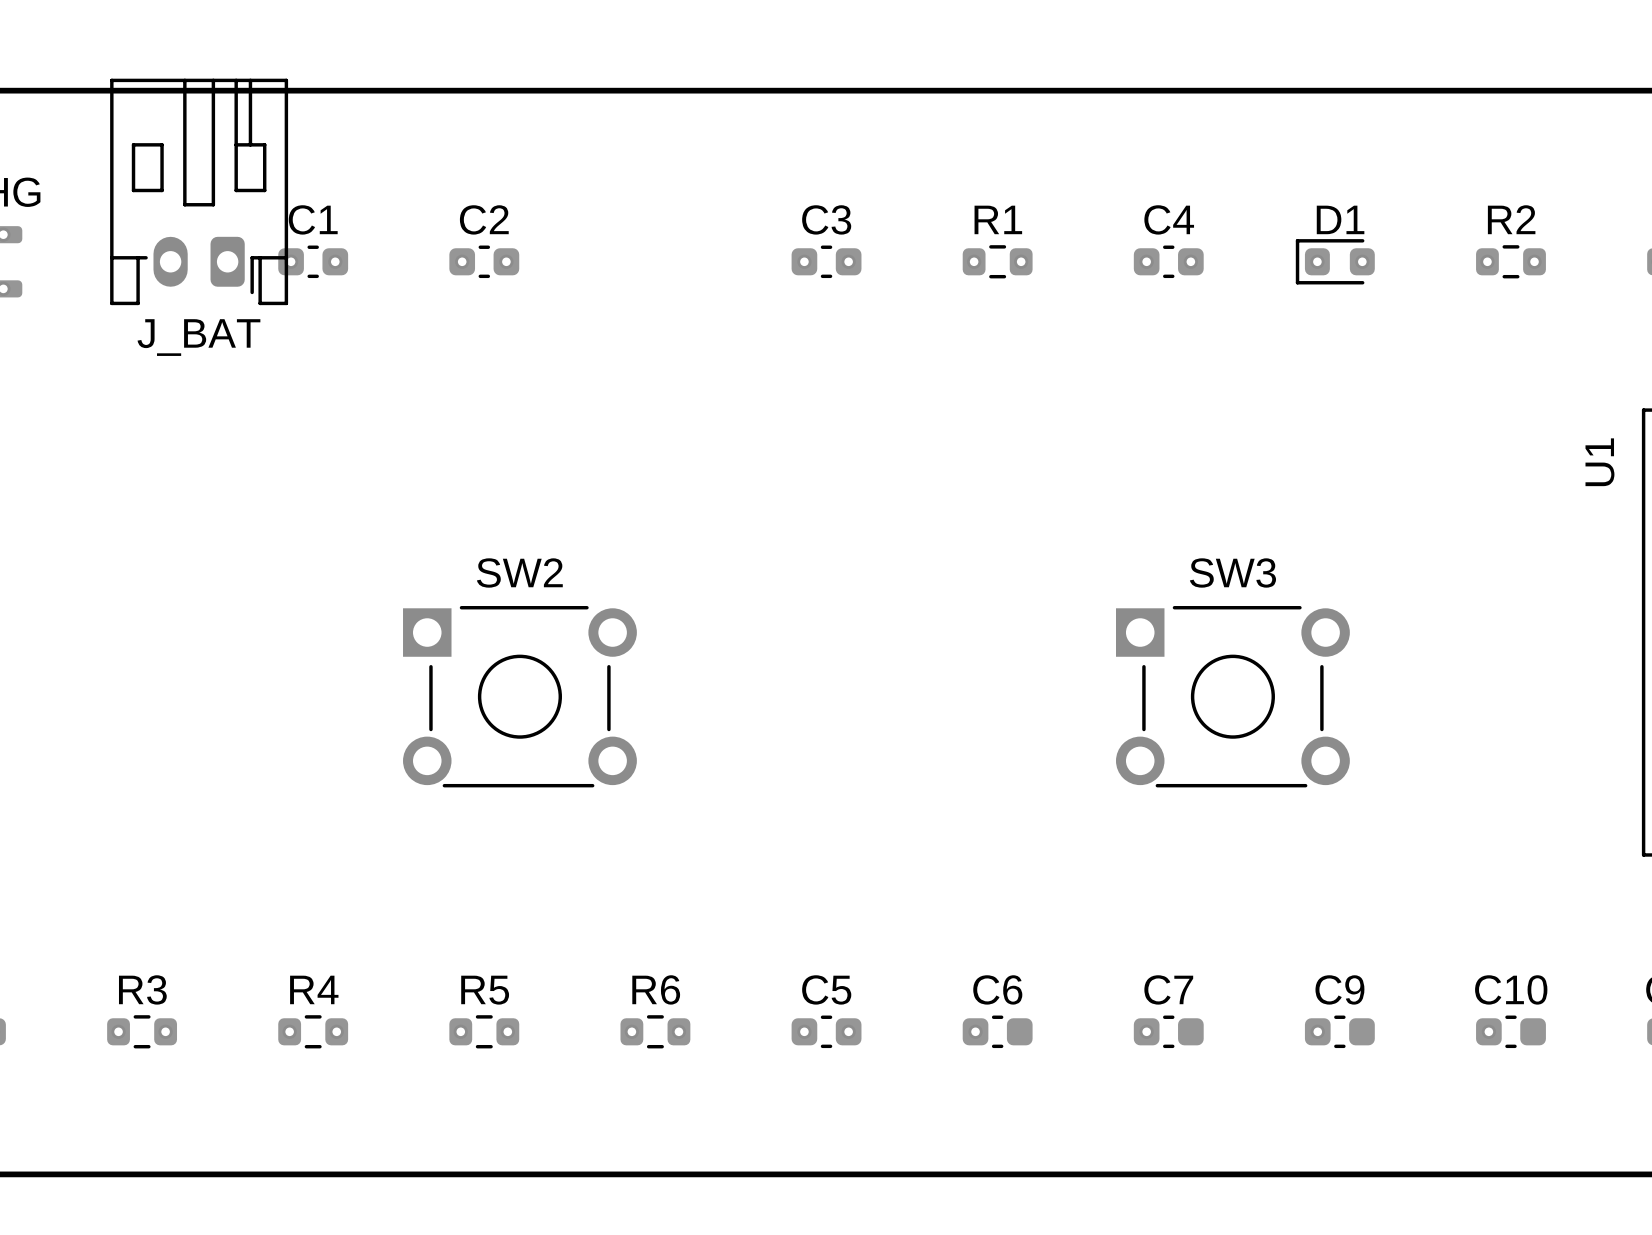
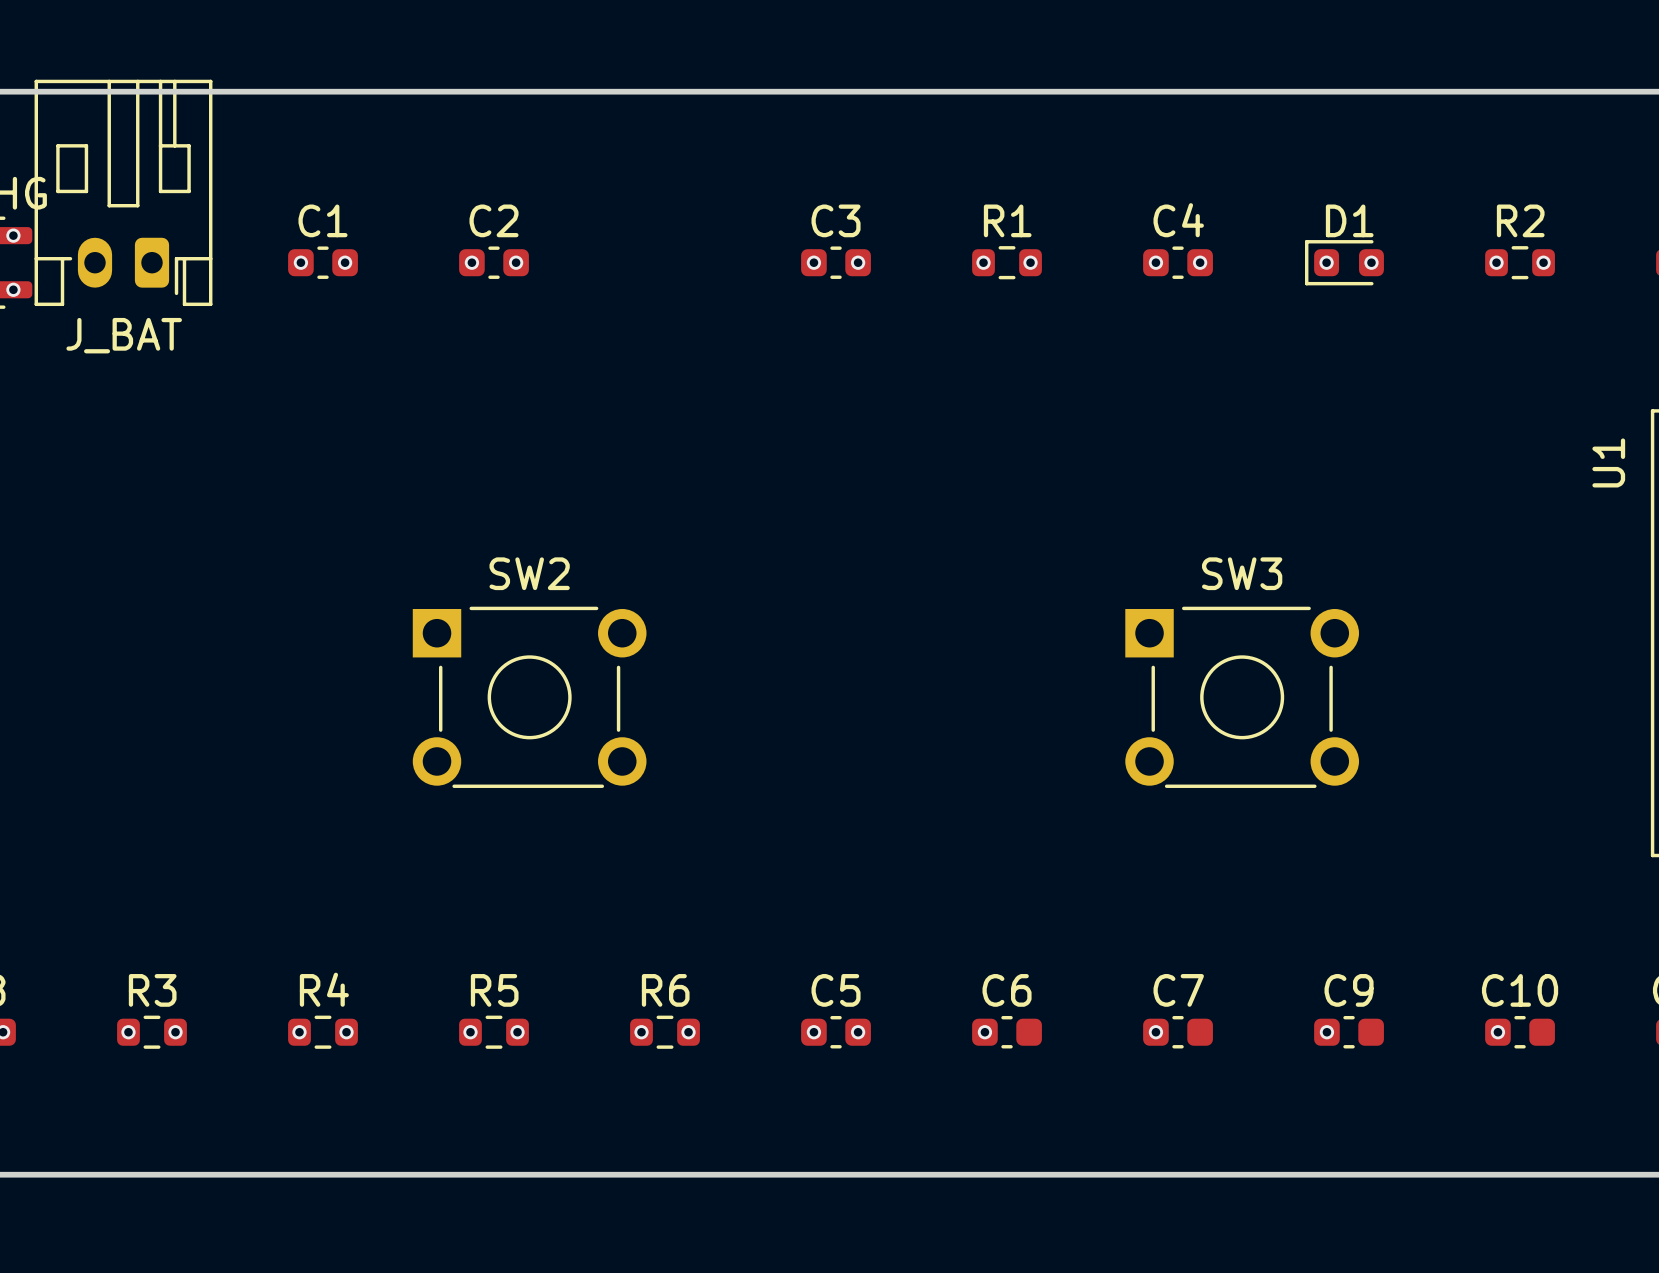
J_BAT position: (199, 191) -> (123, 192)

